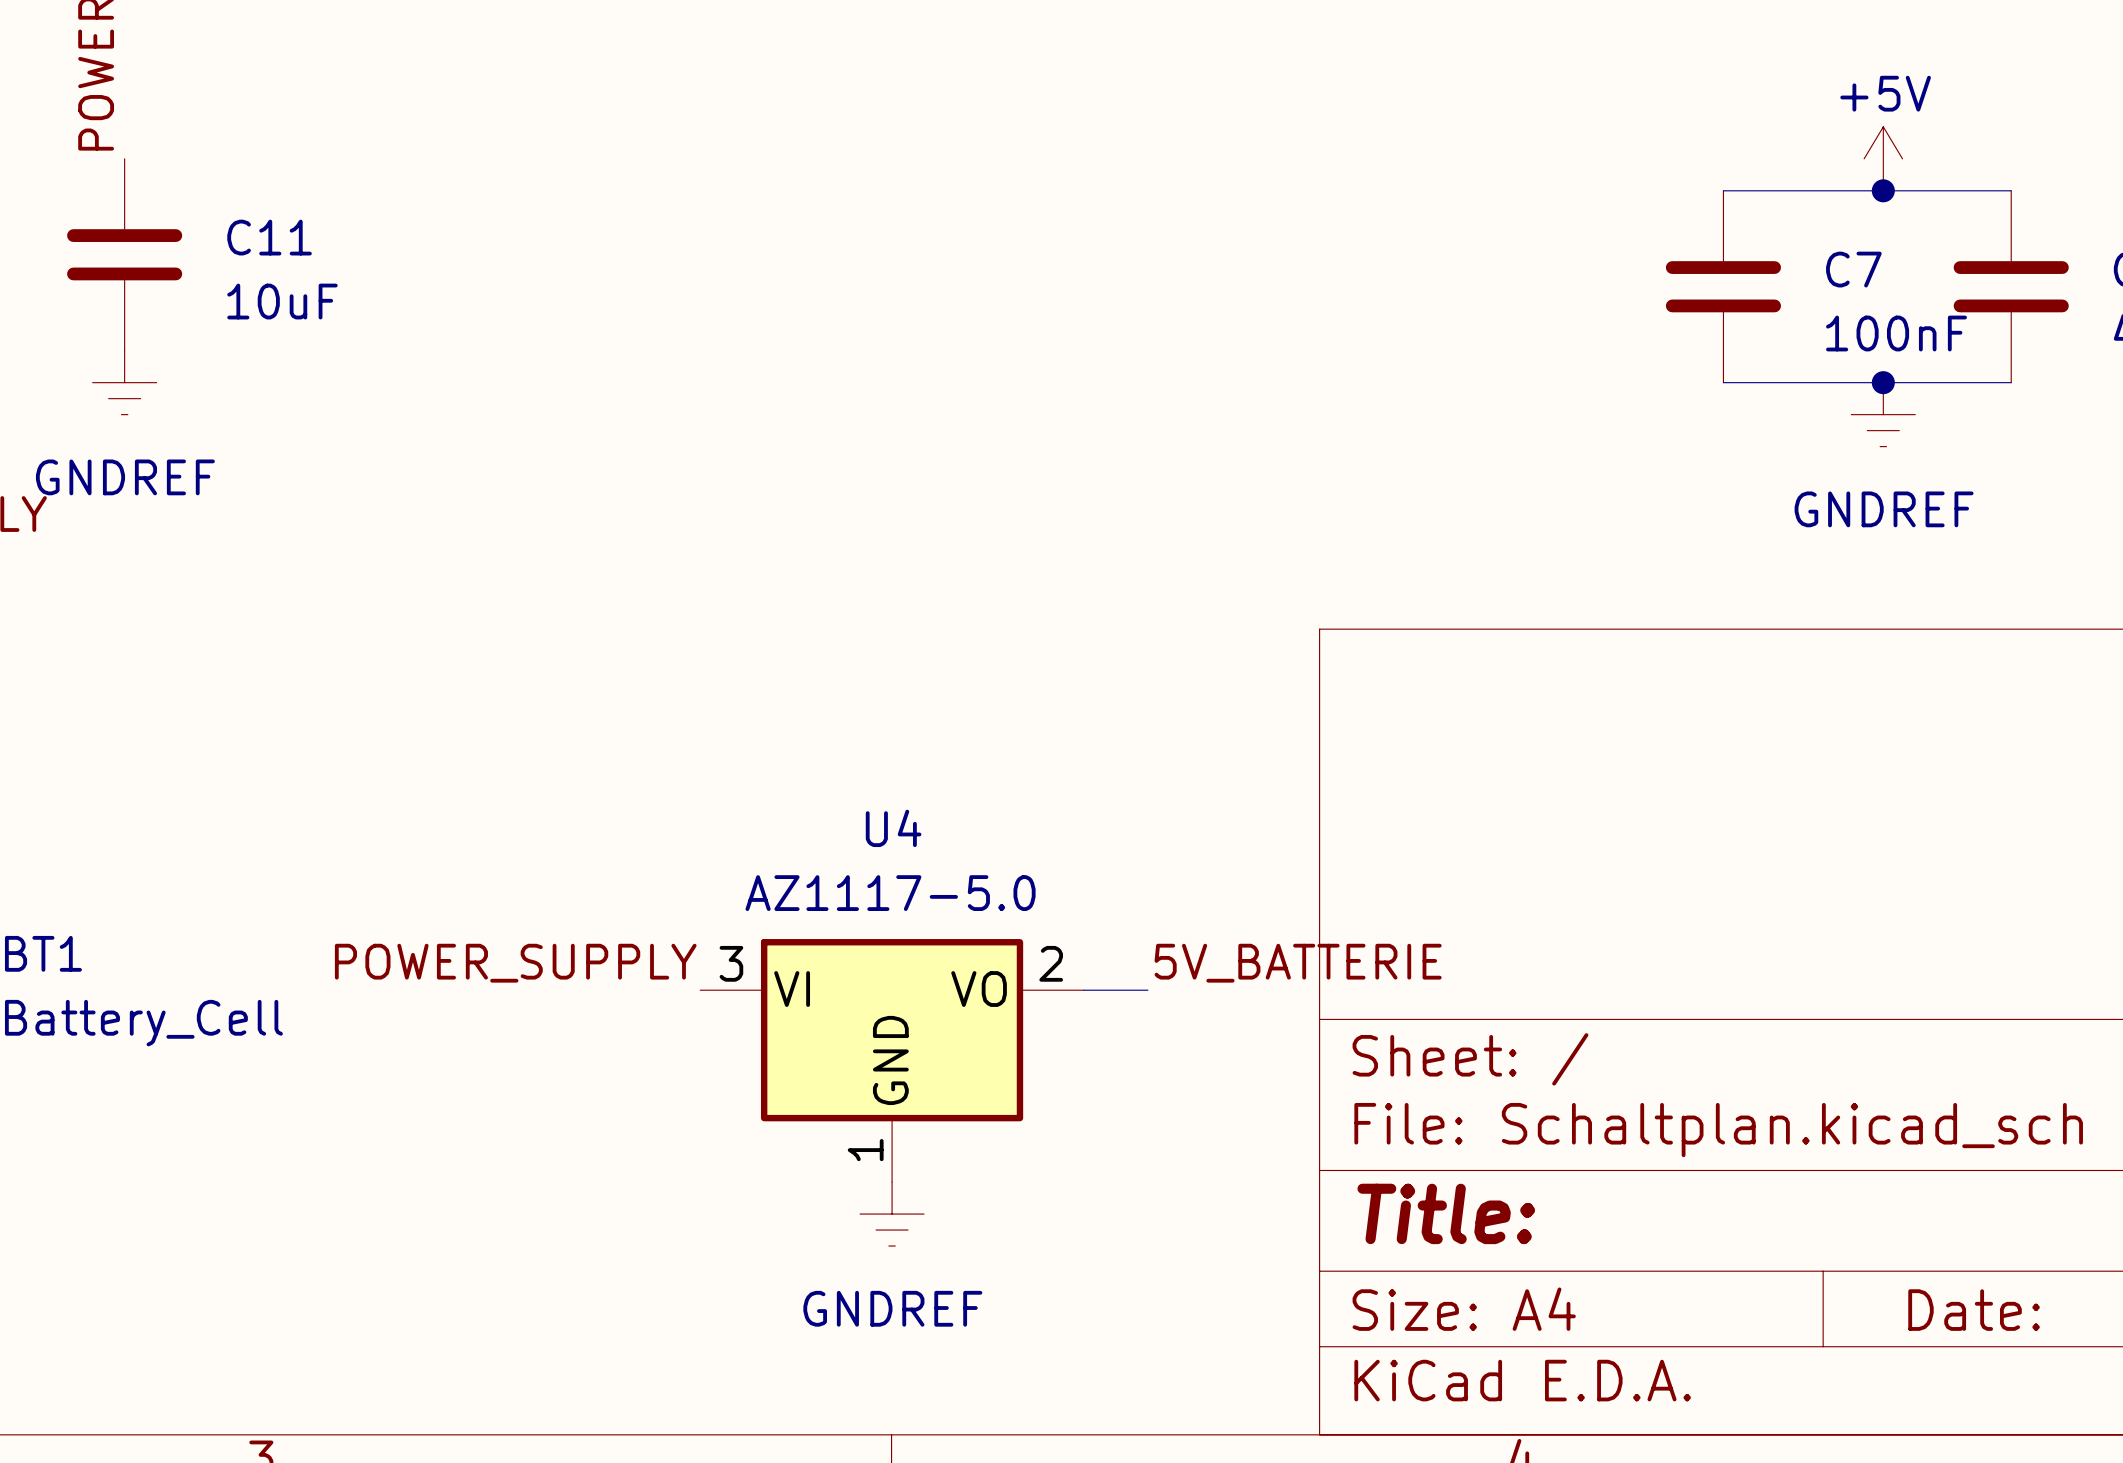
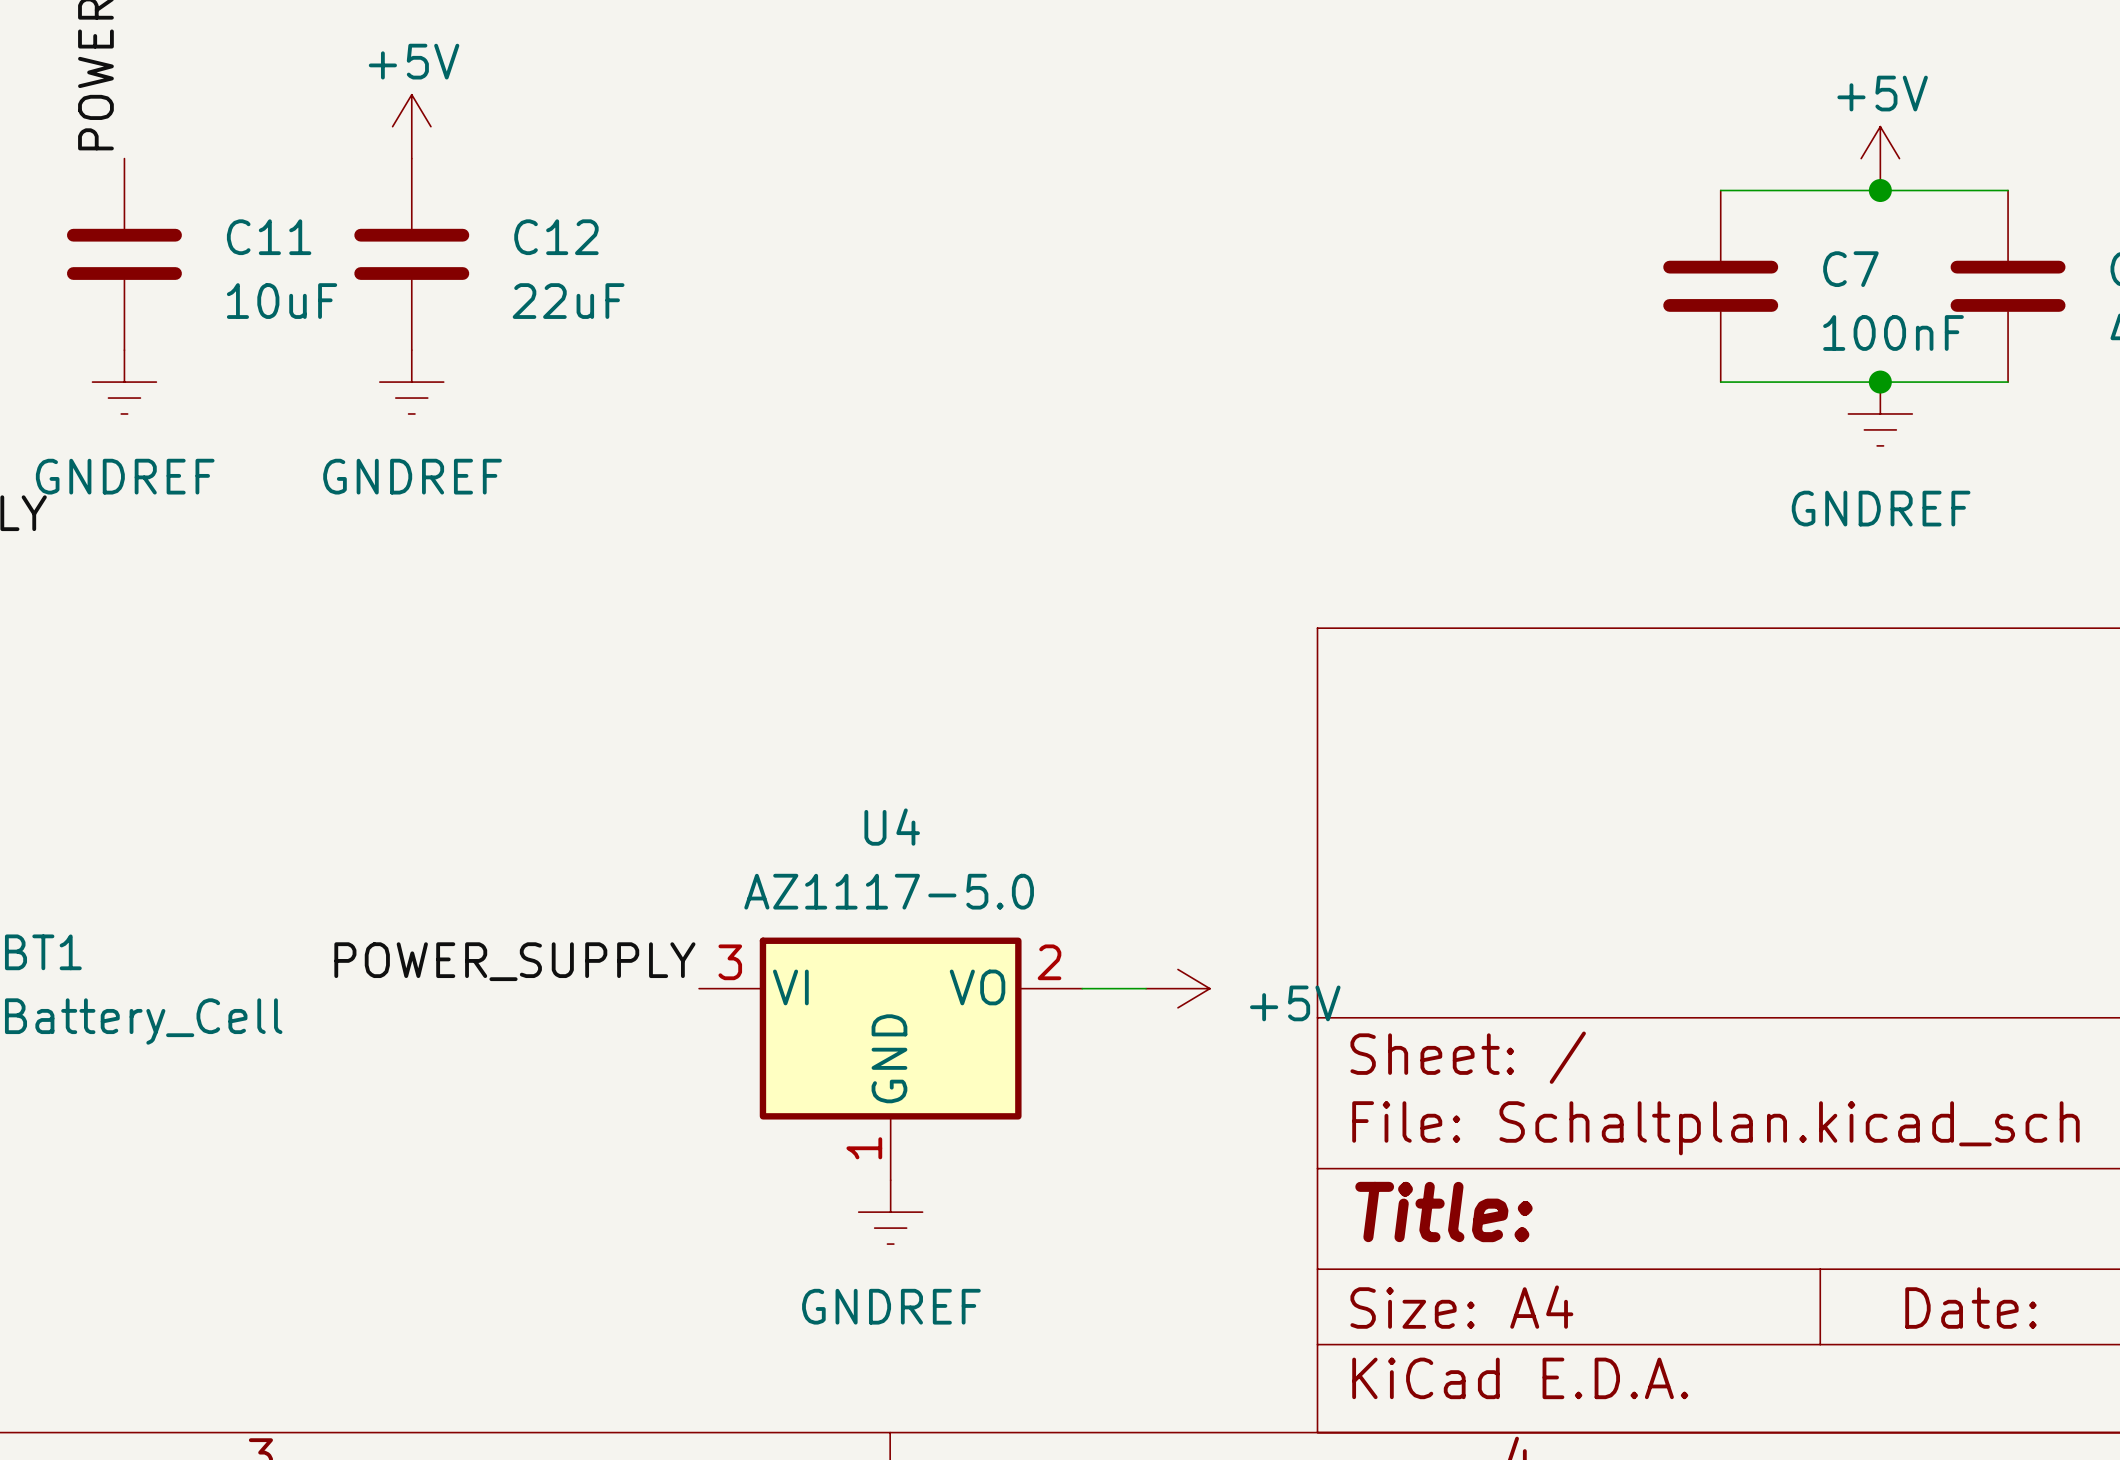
power symbol: none -> +5V (411, 126)
C12: none -> 22uF (411, 254)
power symbol: none -> GNDREF (411, 382)
label: 5V_BATTERIE (1298, 963) -> none
power symbol: none -> +5V (1177, 988)

